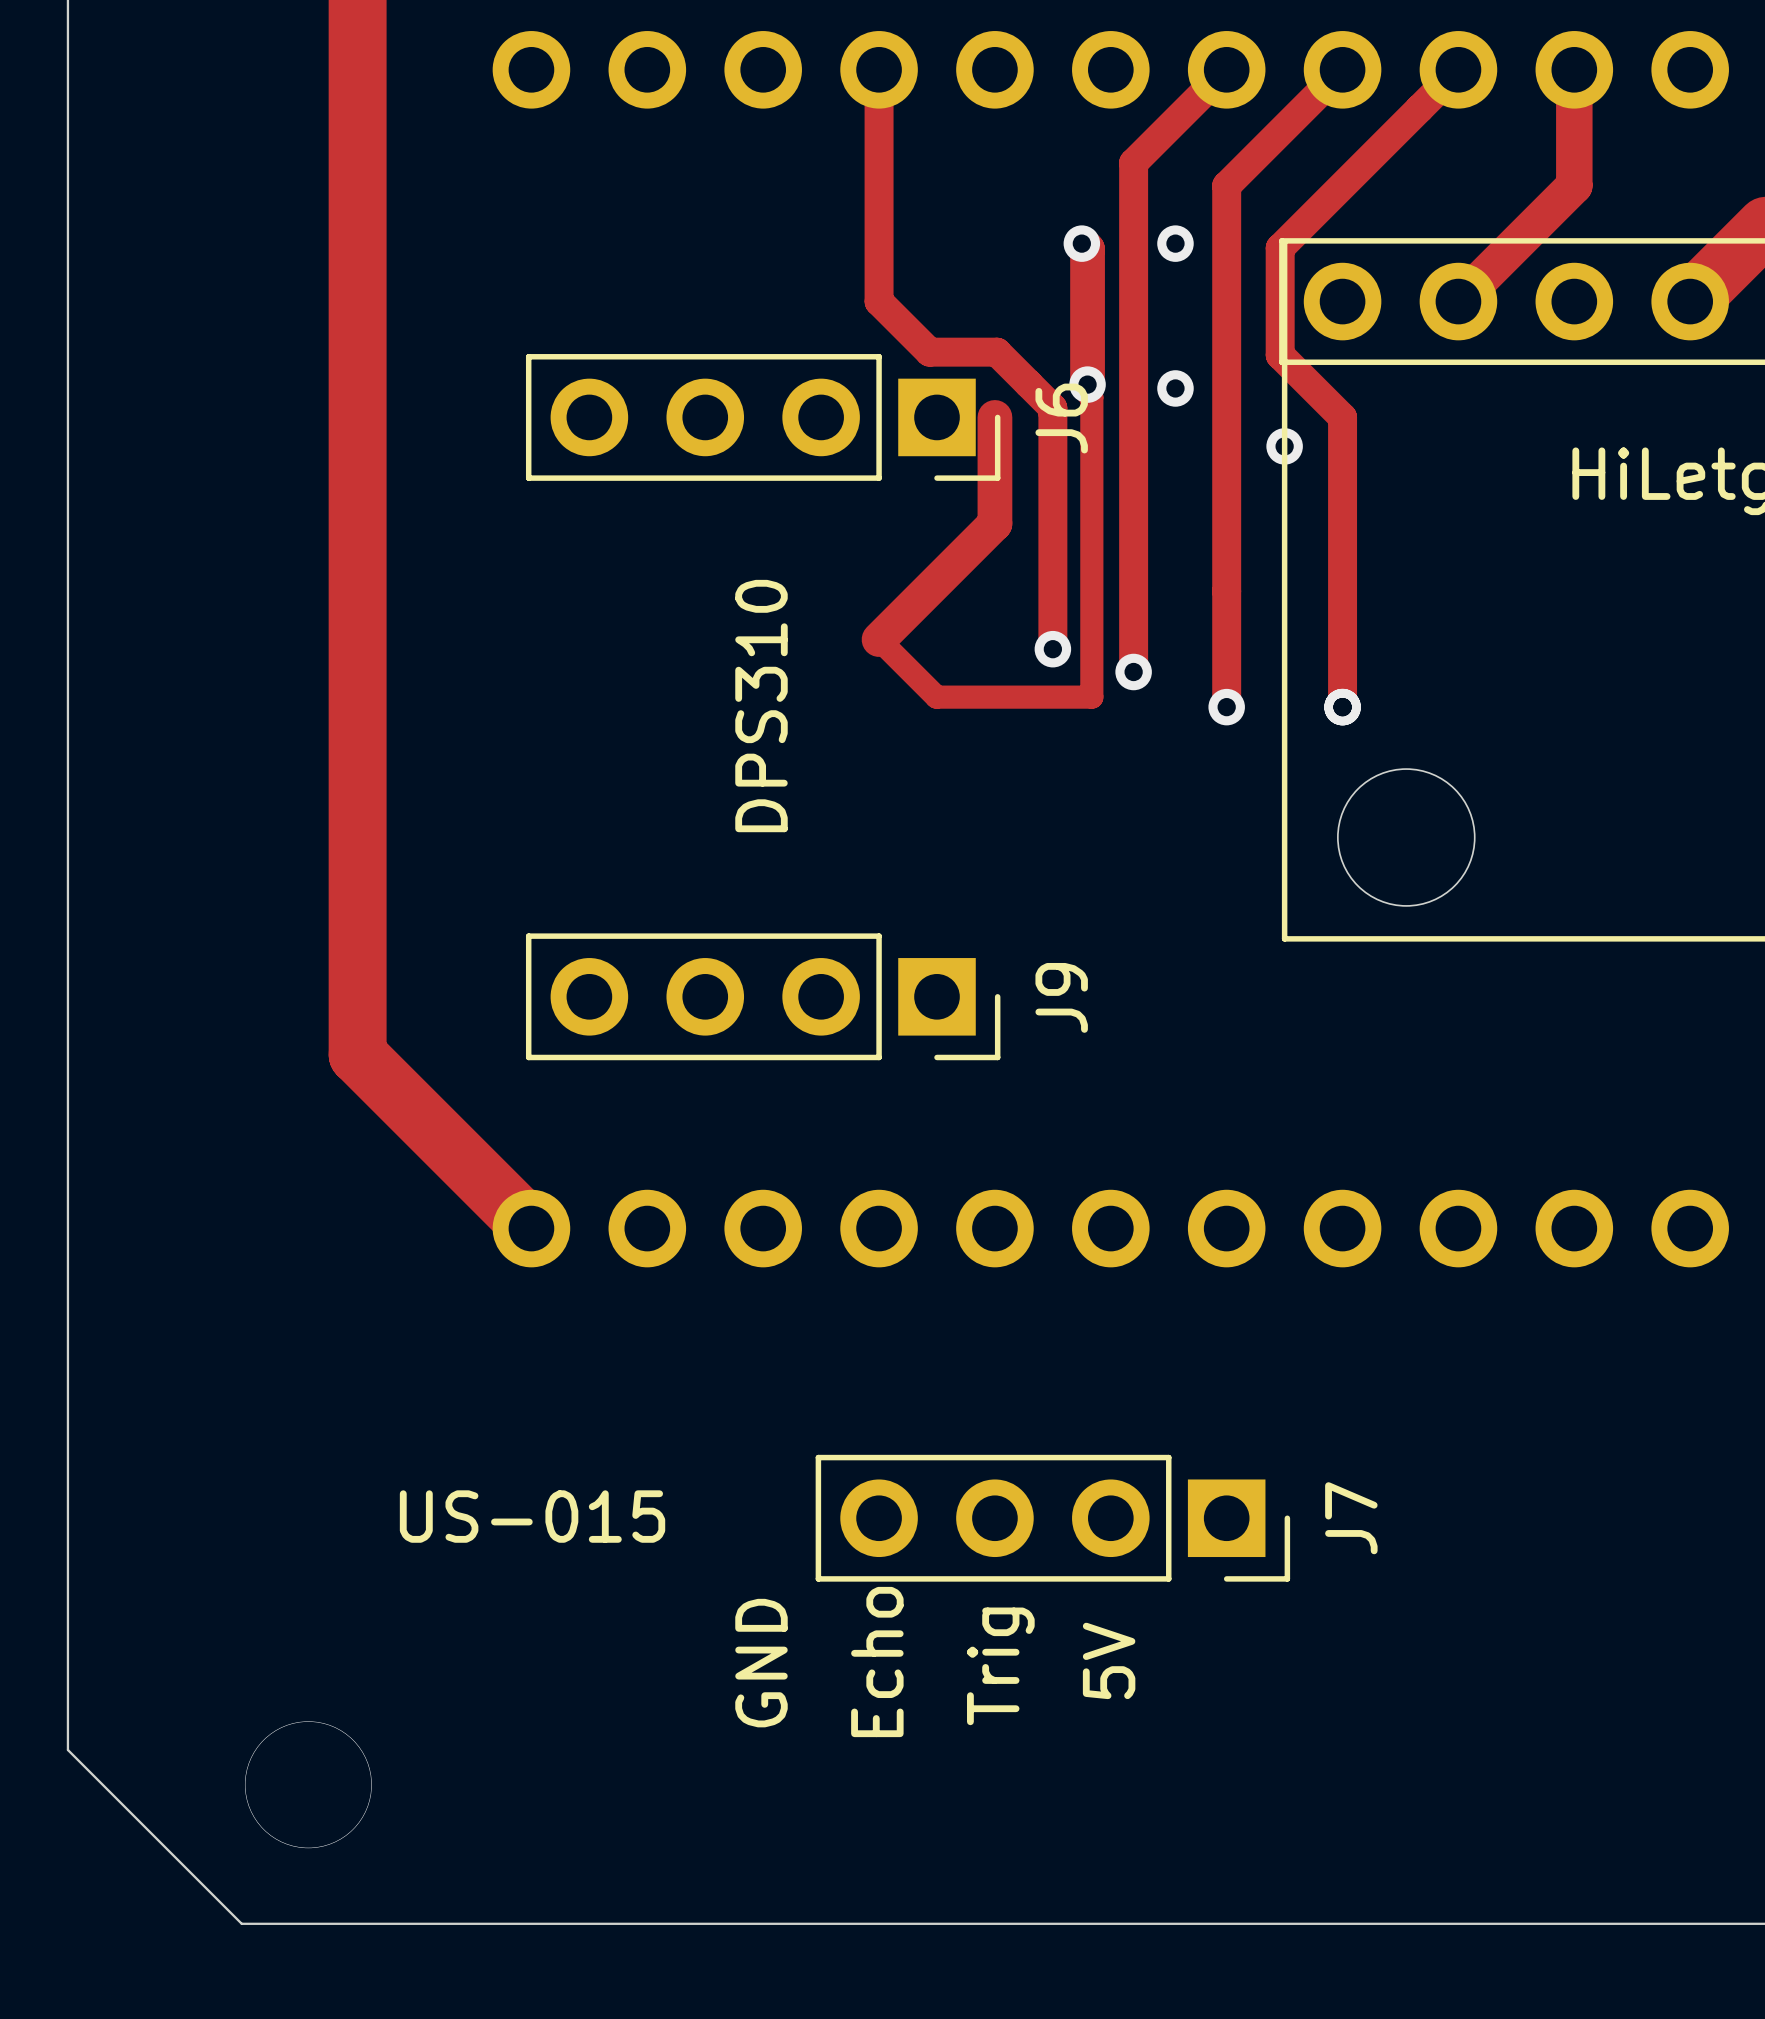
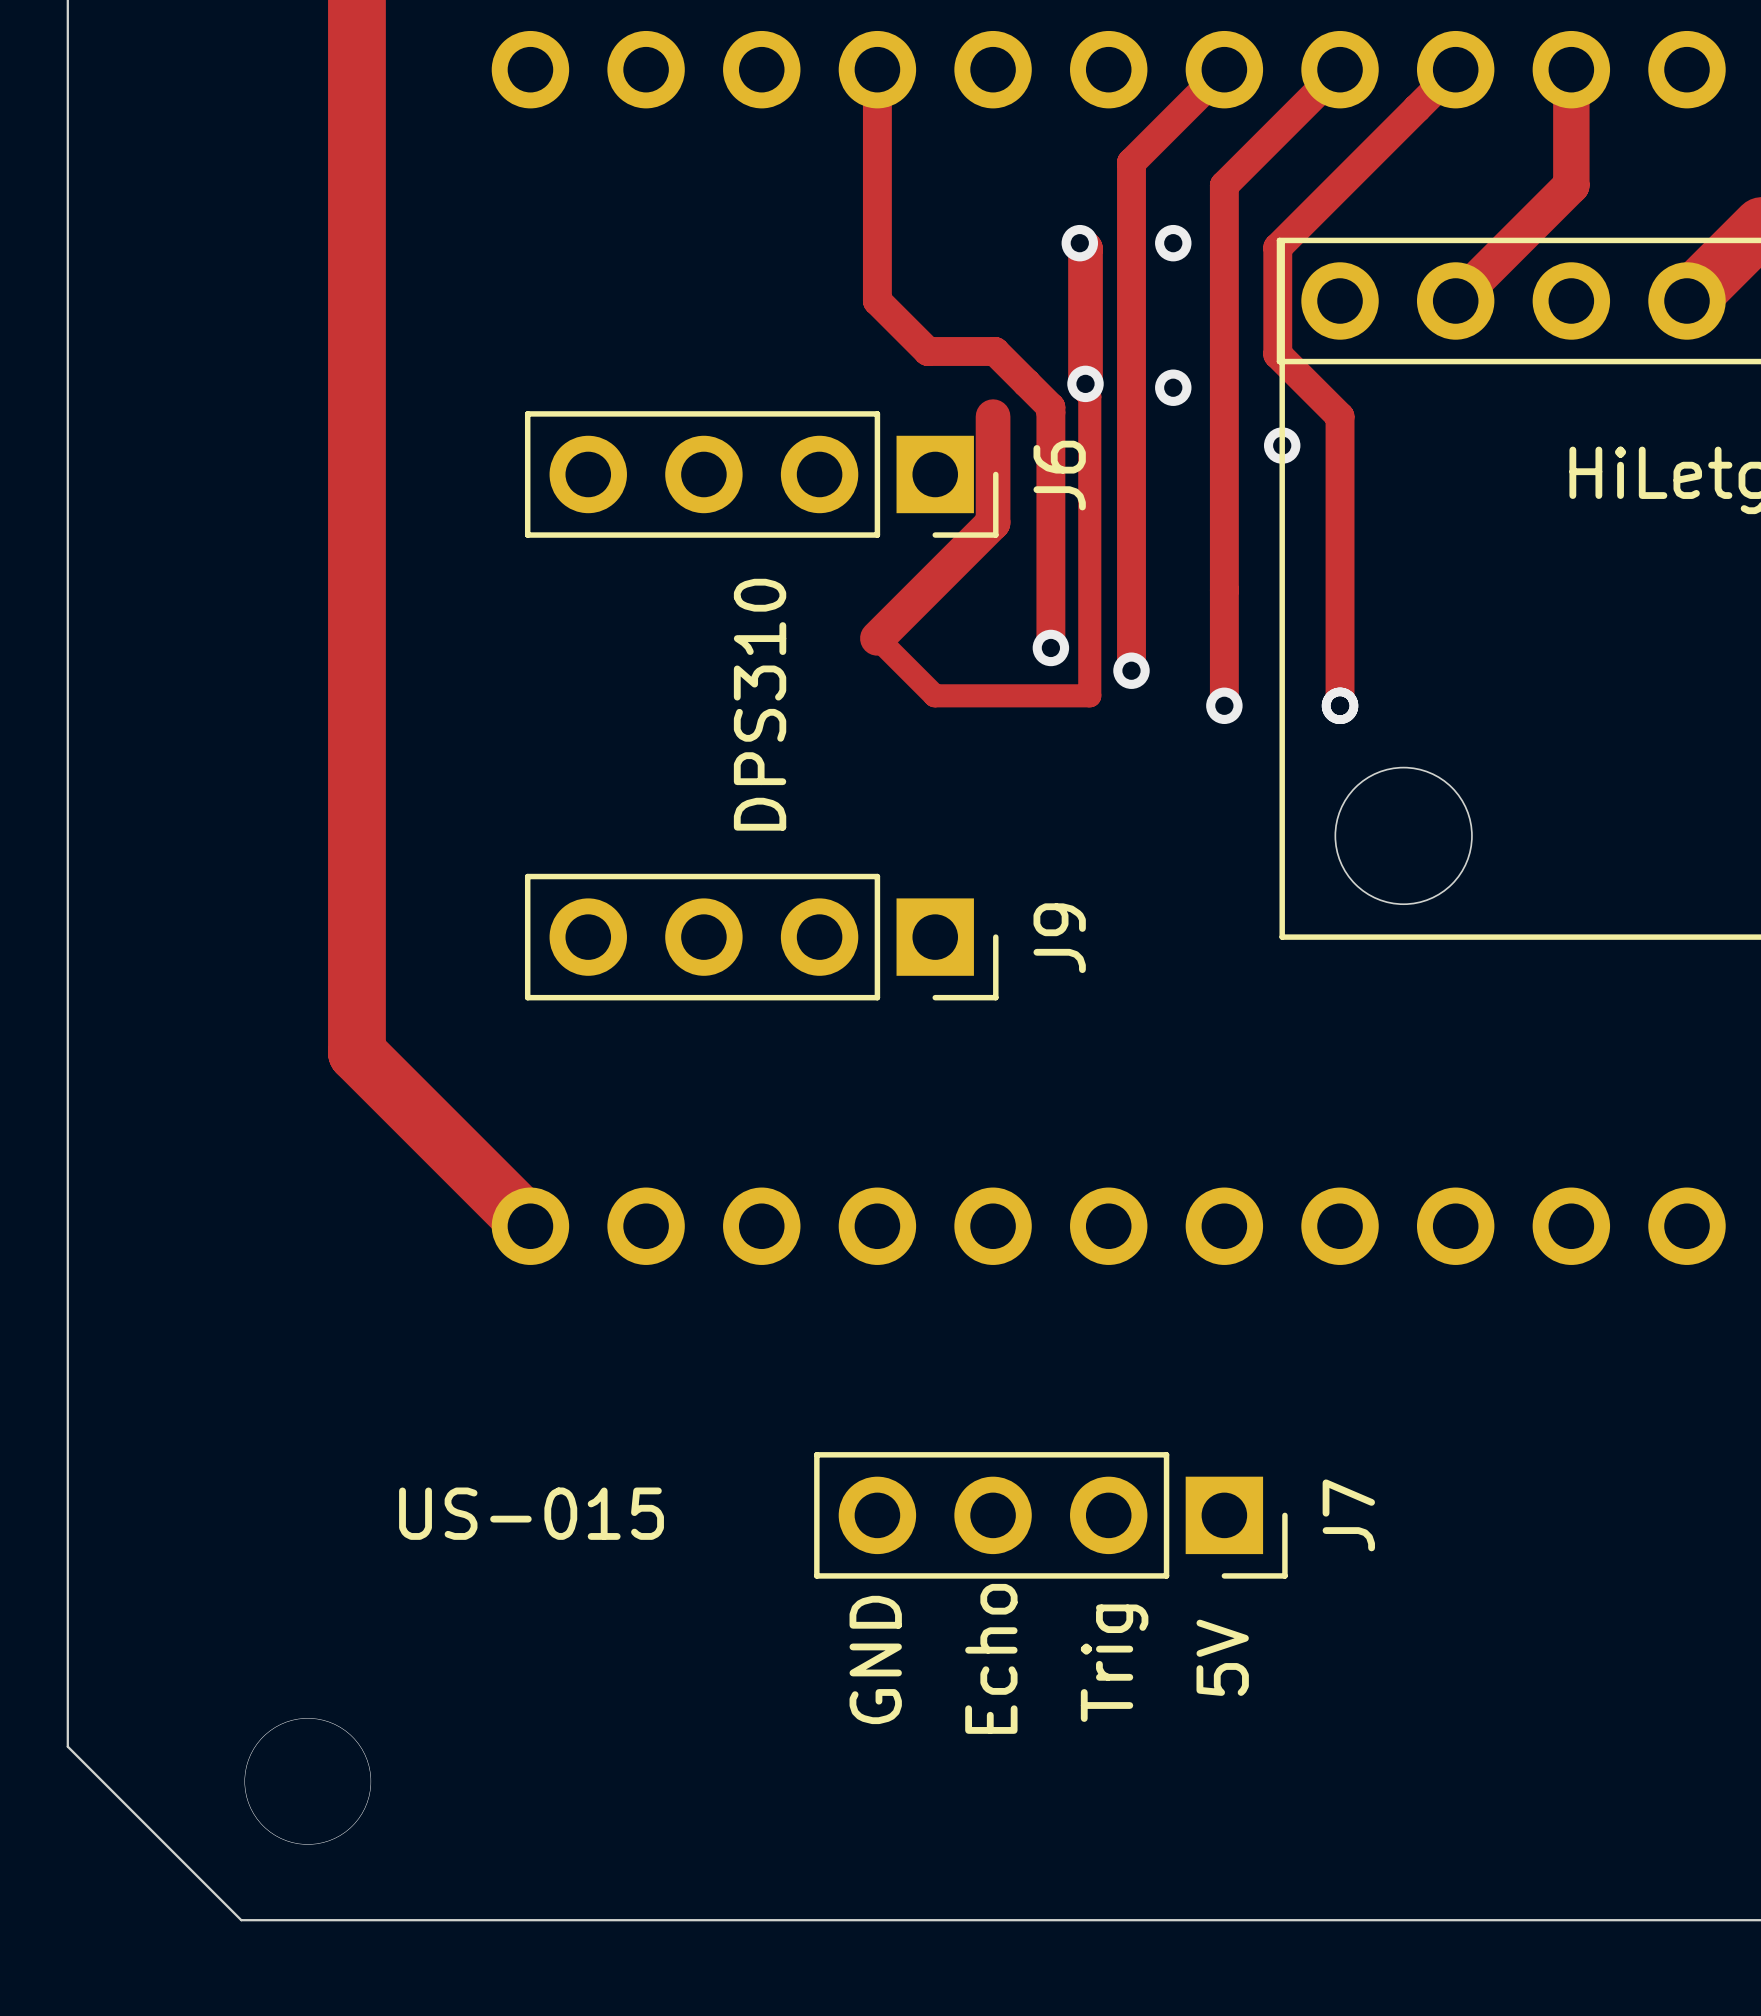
J6 position: (763, 417) -> (761, 474)
J9 position: (763, 996) -> (761, 937)
text: 5V (1109, 1660) -> Trig (1114, 1663)
text: none -> 5V (1222, 1657)
text: Echo (877, 1662) -> GND (875, 1659)
text: GND (761, 1663) -> none
text: Trig (1000, 1666) -> Echo (991, 1658)

